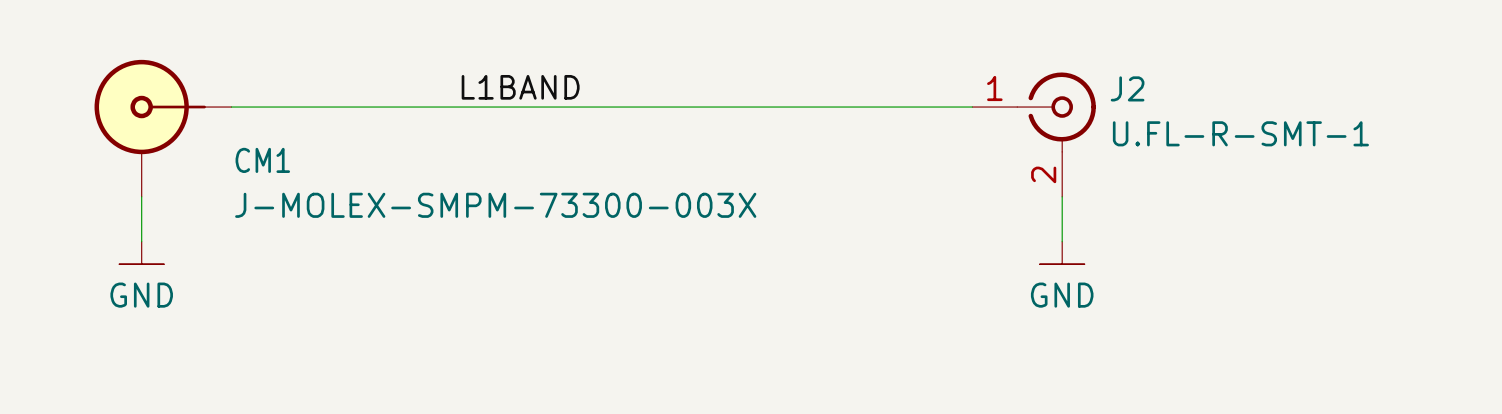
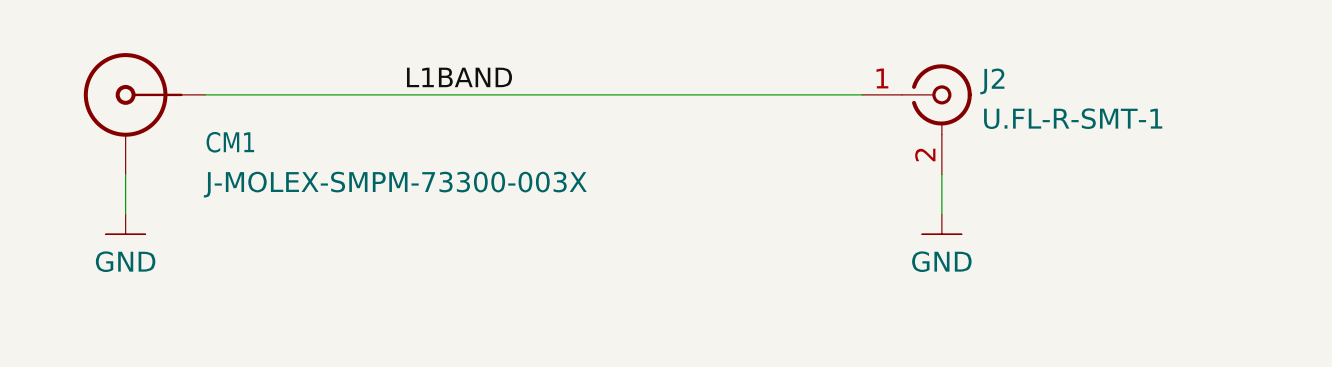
CM1 symbol: [94, 59, 232, 197] -> [83, 53, 206, 175]

